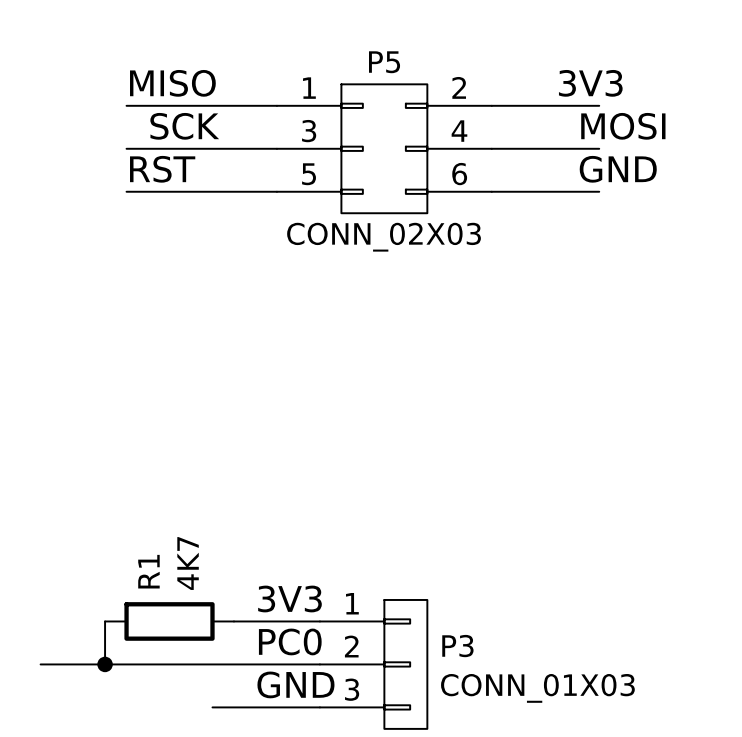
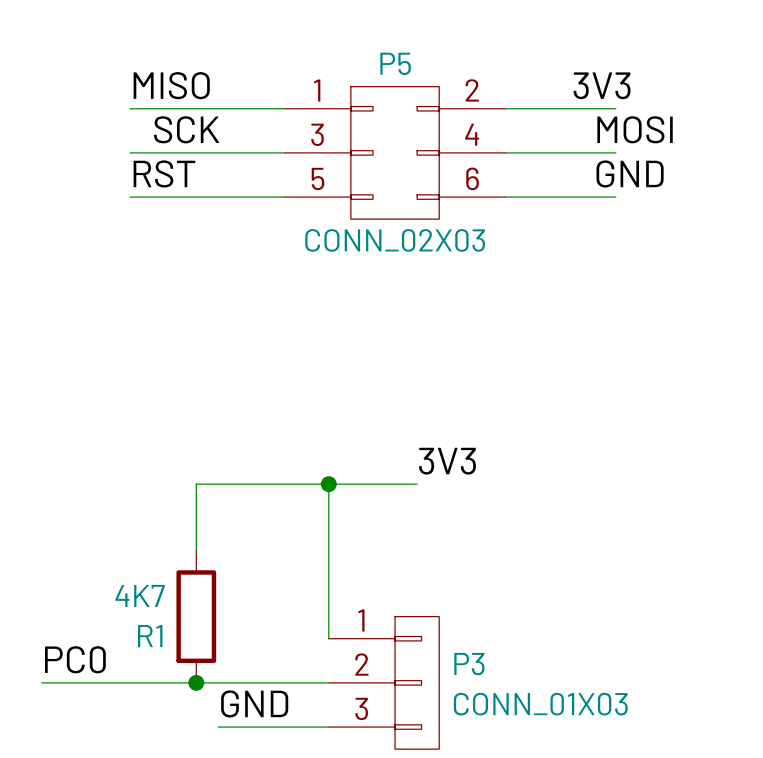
junction: none -> (328, 484)
wire: none -> (417, 484) (196, 484) (196, 550)
R1 value position: 4K7 (188, 563) -> 4K7 (140, 595)
R1 name position: R1 (148, 571) -> R1 (150, 636)
label position: 3V3 (289, 598) -> 3V3 (447, 461)
wire: (105, 621) (105, 664) -> none
R1 rotation: 0° (169, 621) -> 90° clockwise (196, 616)
wire: (233, 621) (319, 621) -> (328, 484) (328, 638)
label position: PC0 (290, 641) -> PC0 (75, 659)
junction position: (105, 664) -> (196, 682)
label position: GND (295, 684) -> GND (254, 703)

